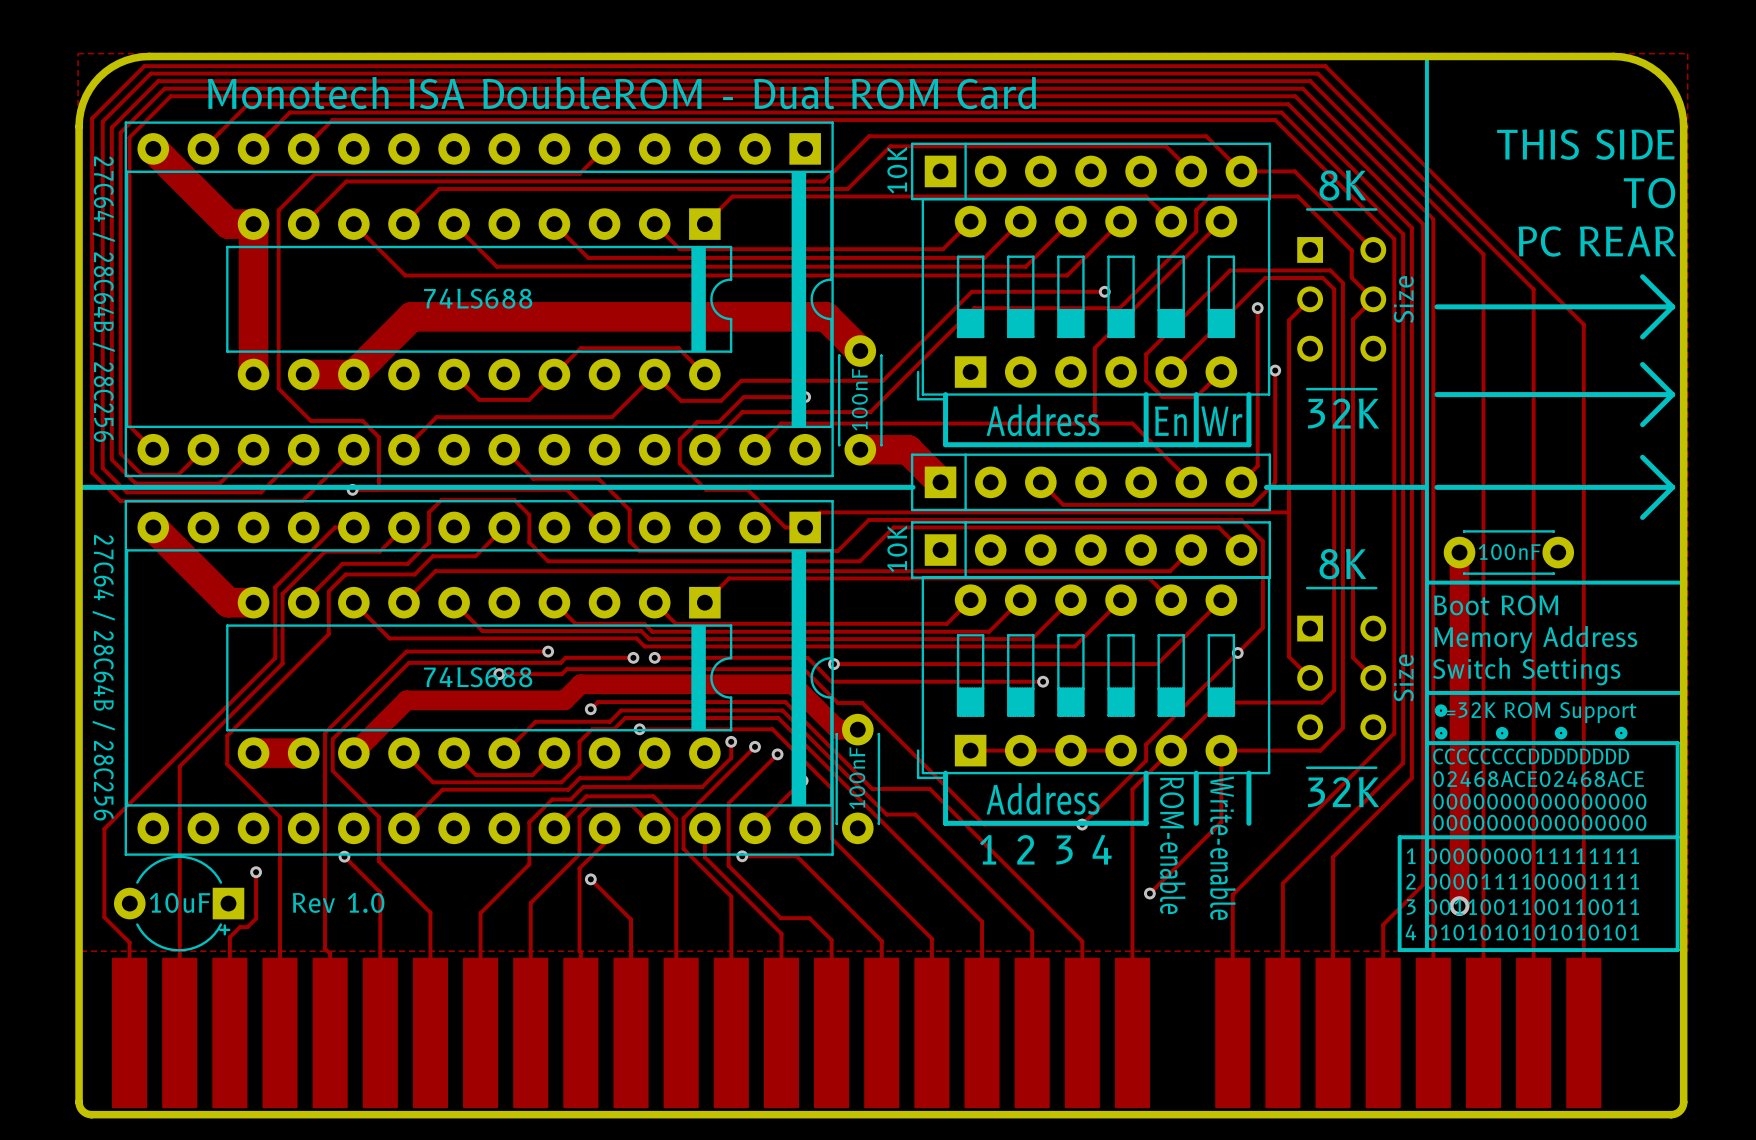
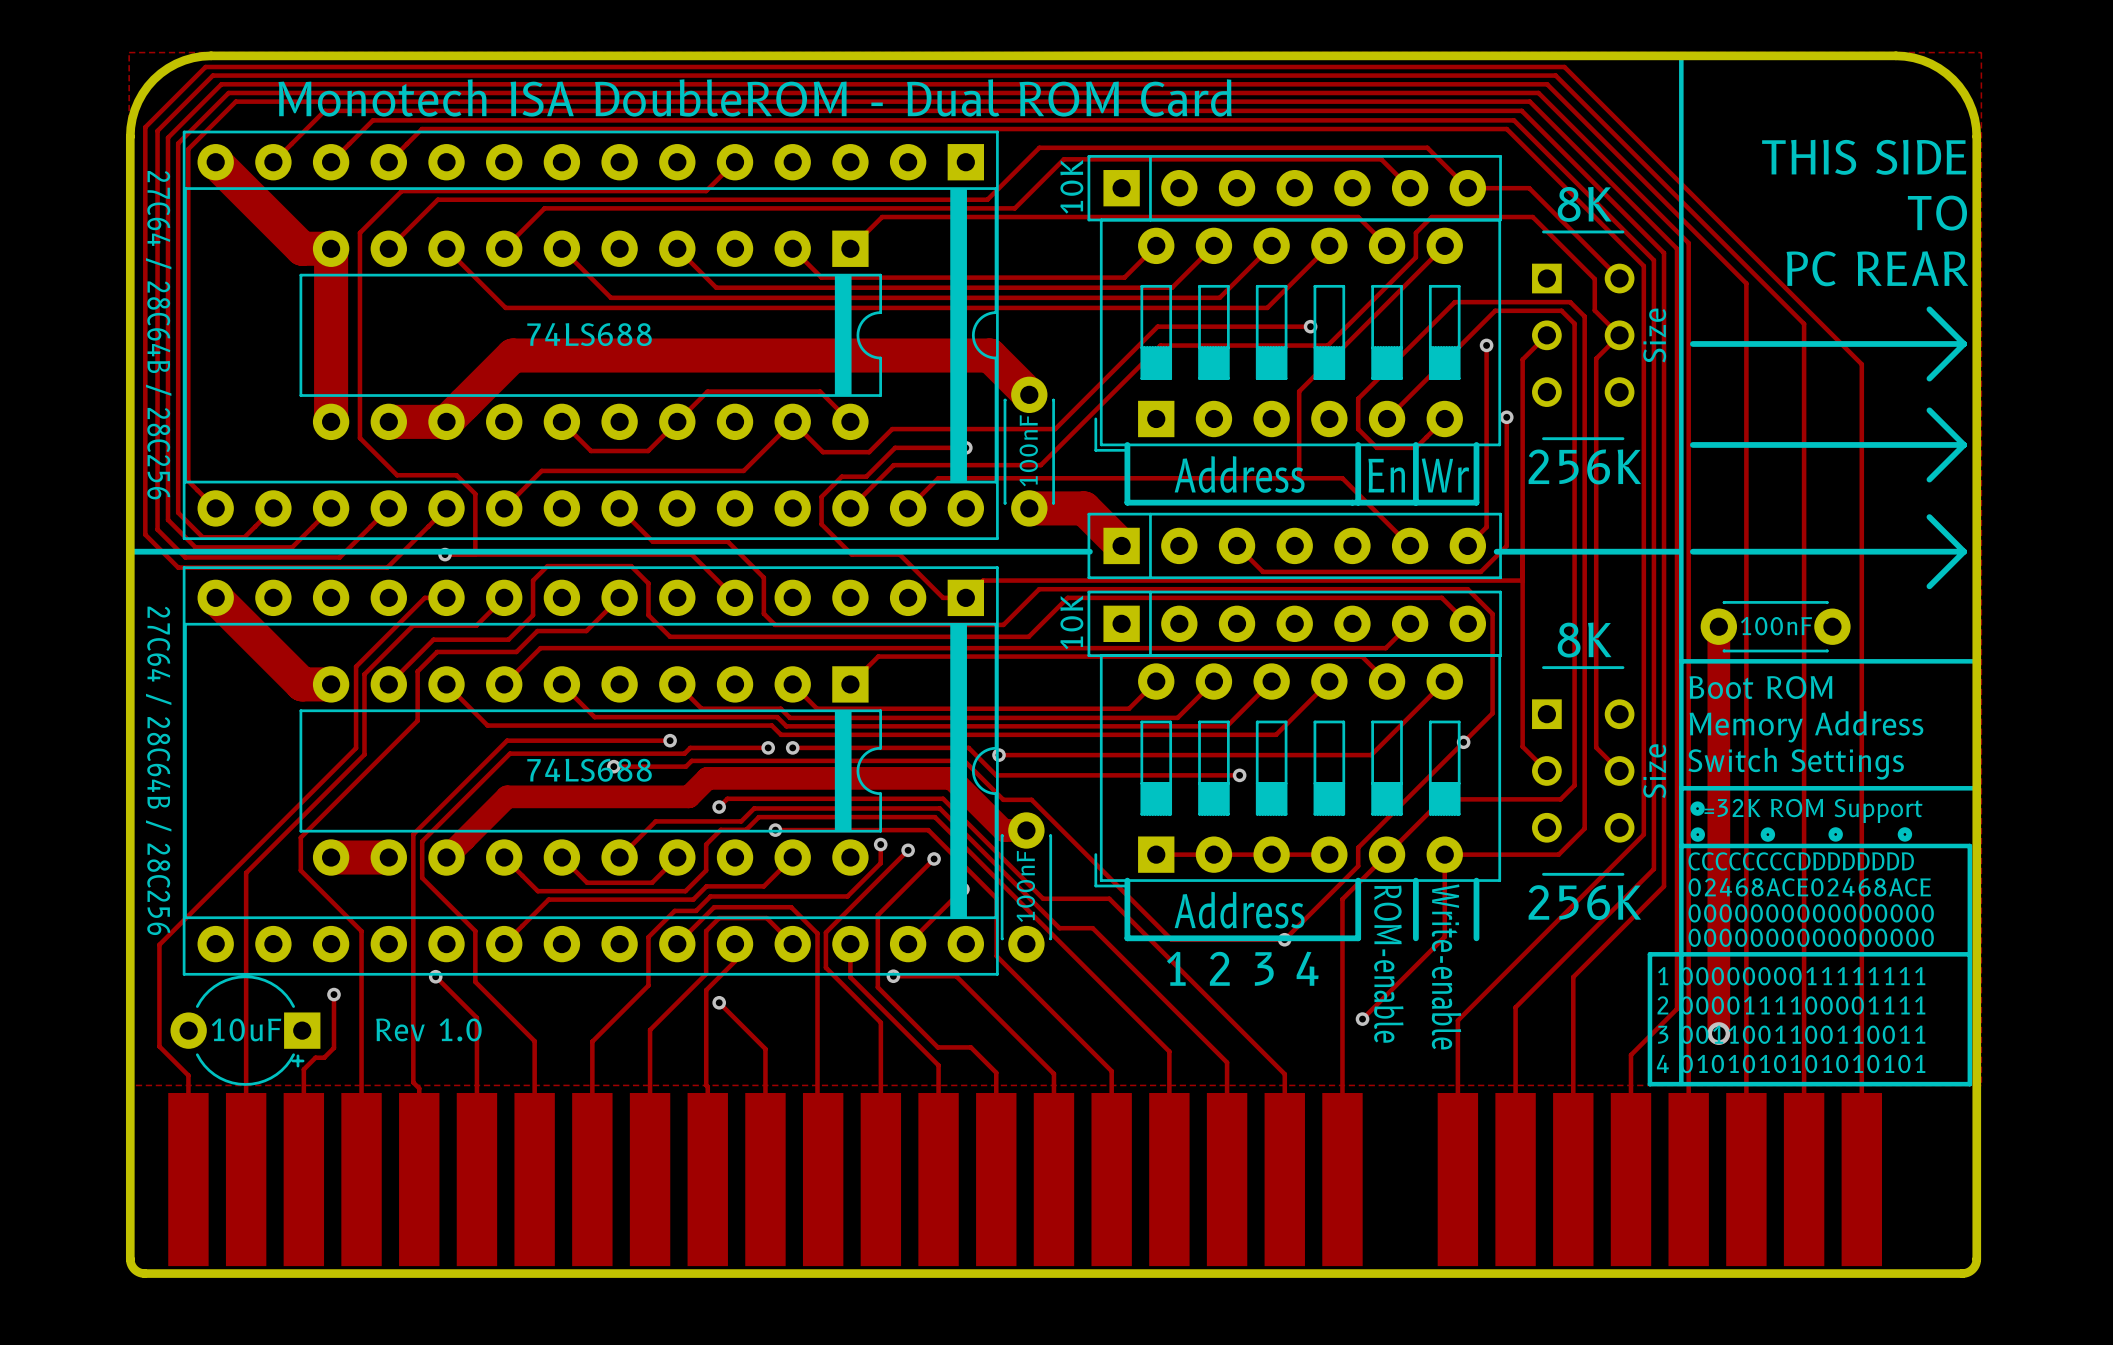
text: 32K (1343, 413) -> 256K (1584, 466)
text: 32K (1343, 792) -> 256K (1584, 902)

